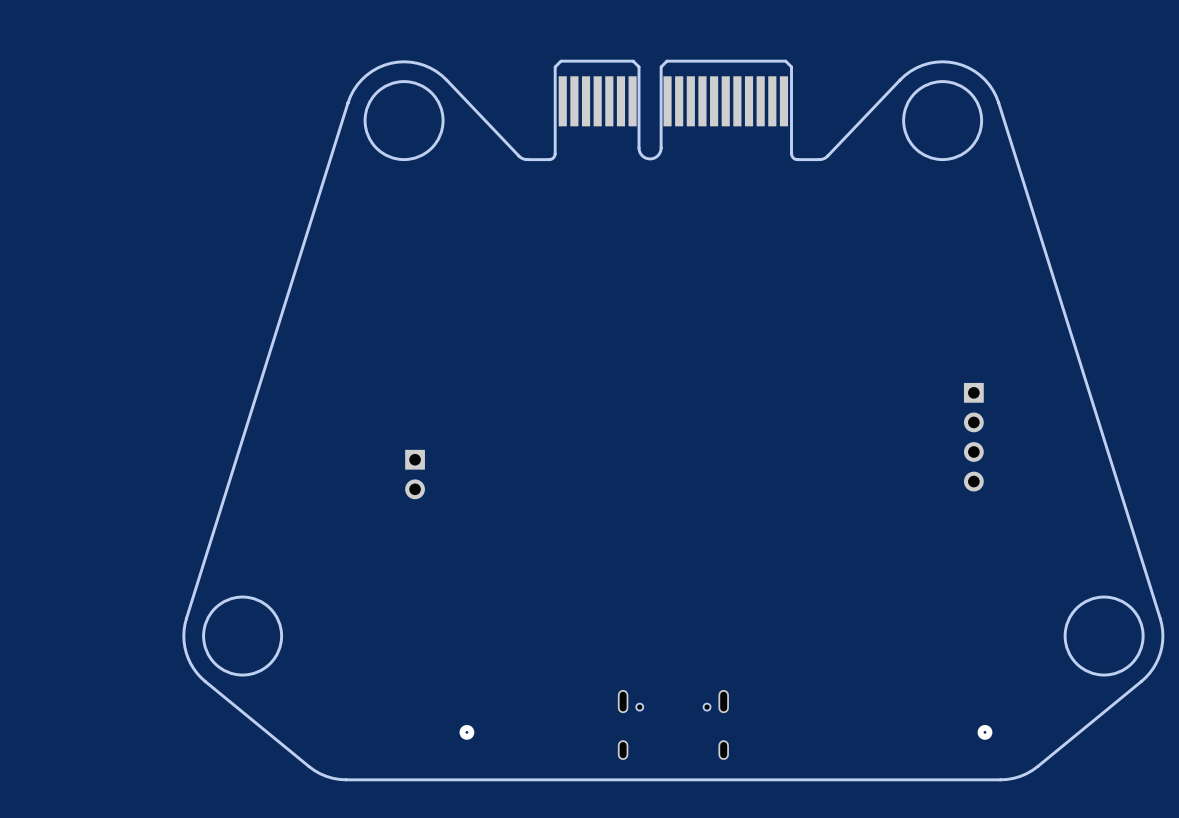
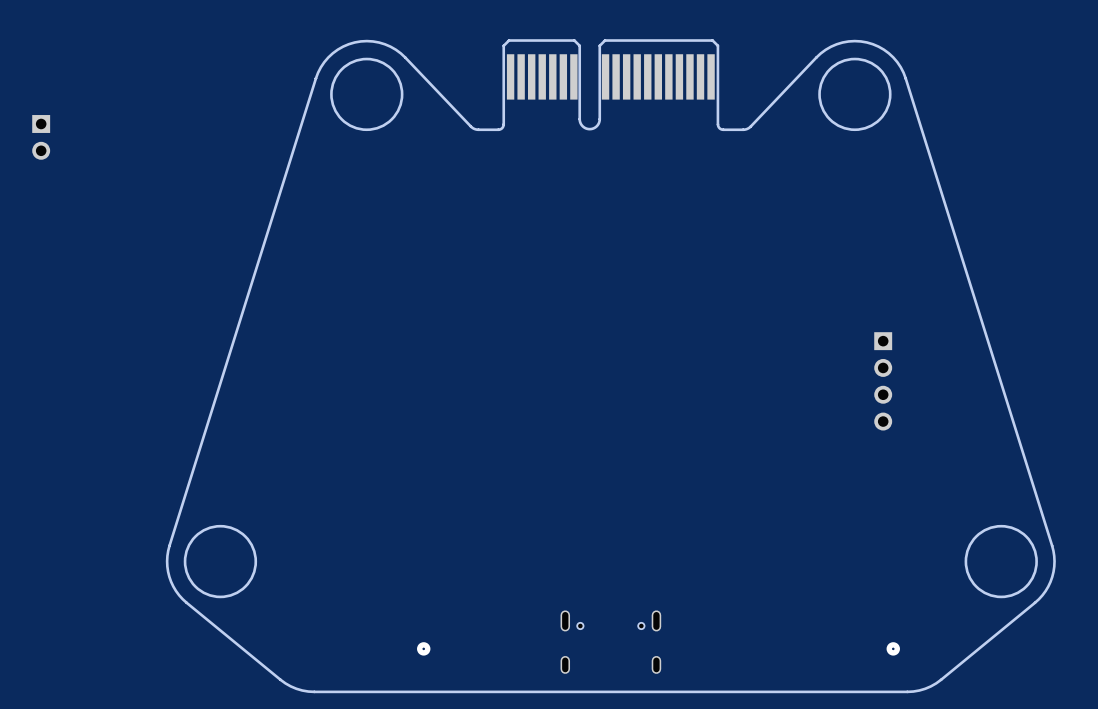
part: none -> (41, 137)
part: (415, 474) -> none

